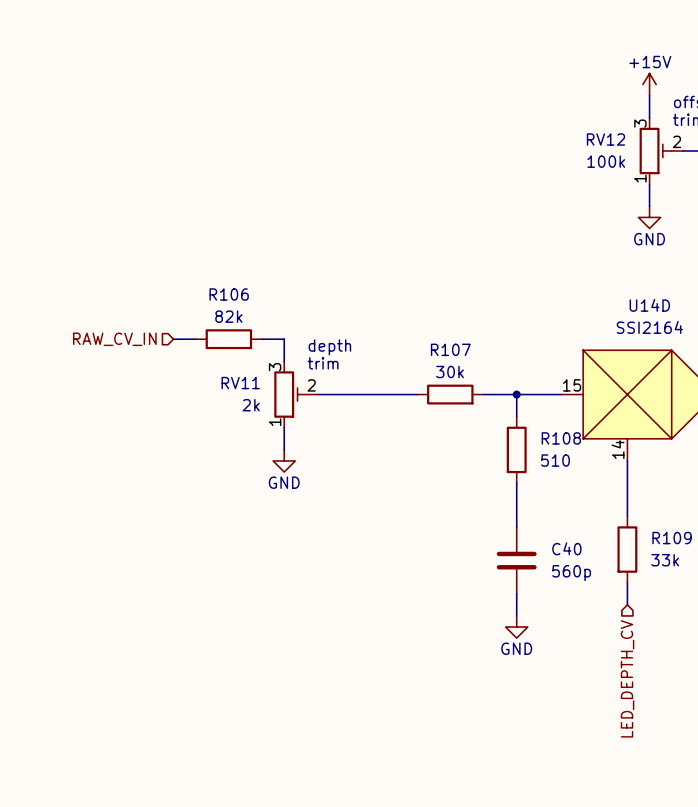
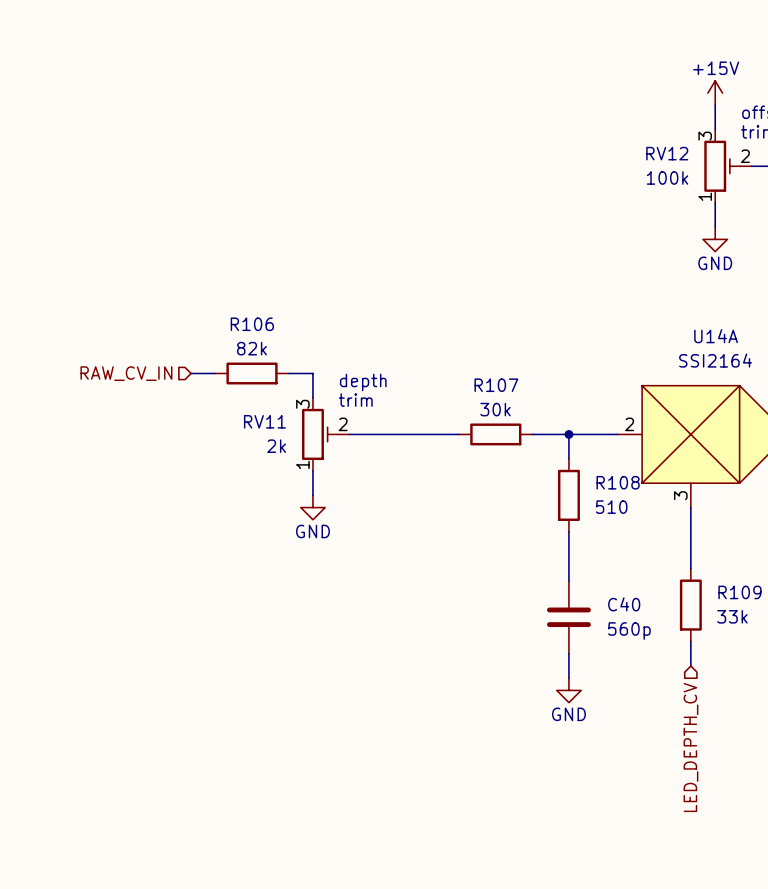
U14D name: U14D (649, 305) -> U14A (716, 336)
U14D pin number: 15 (572, 385) -> 2 (629, 424)
U14D pin number: 14 (618, 449) -> 3 (680, 495)

